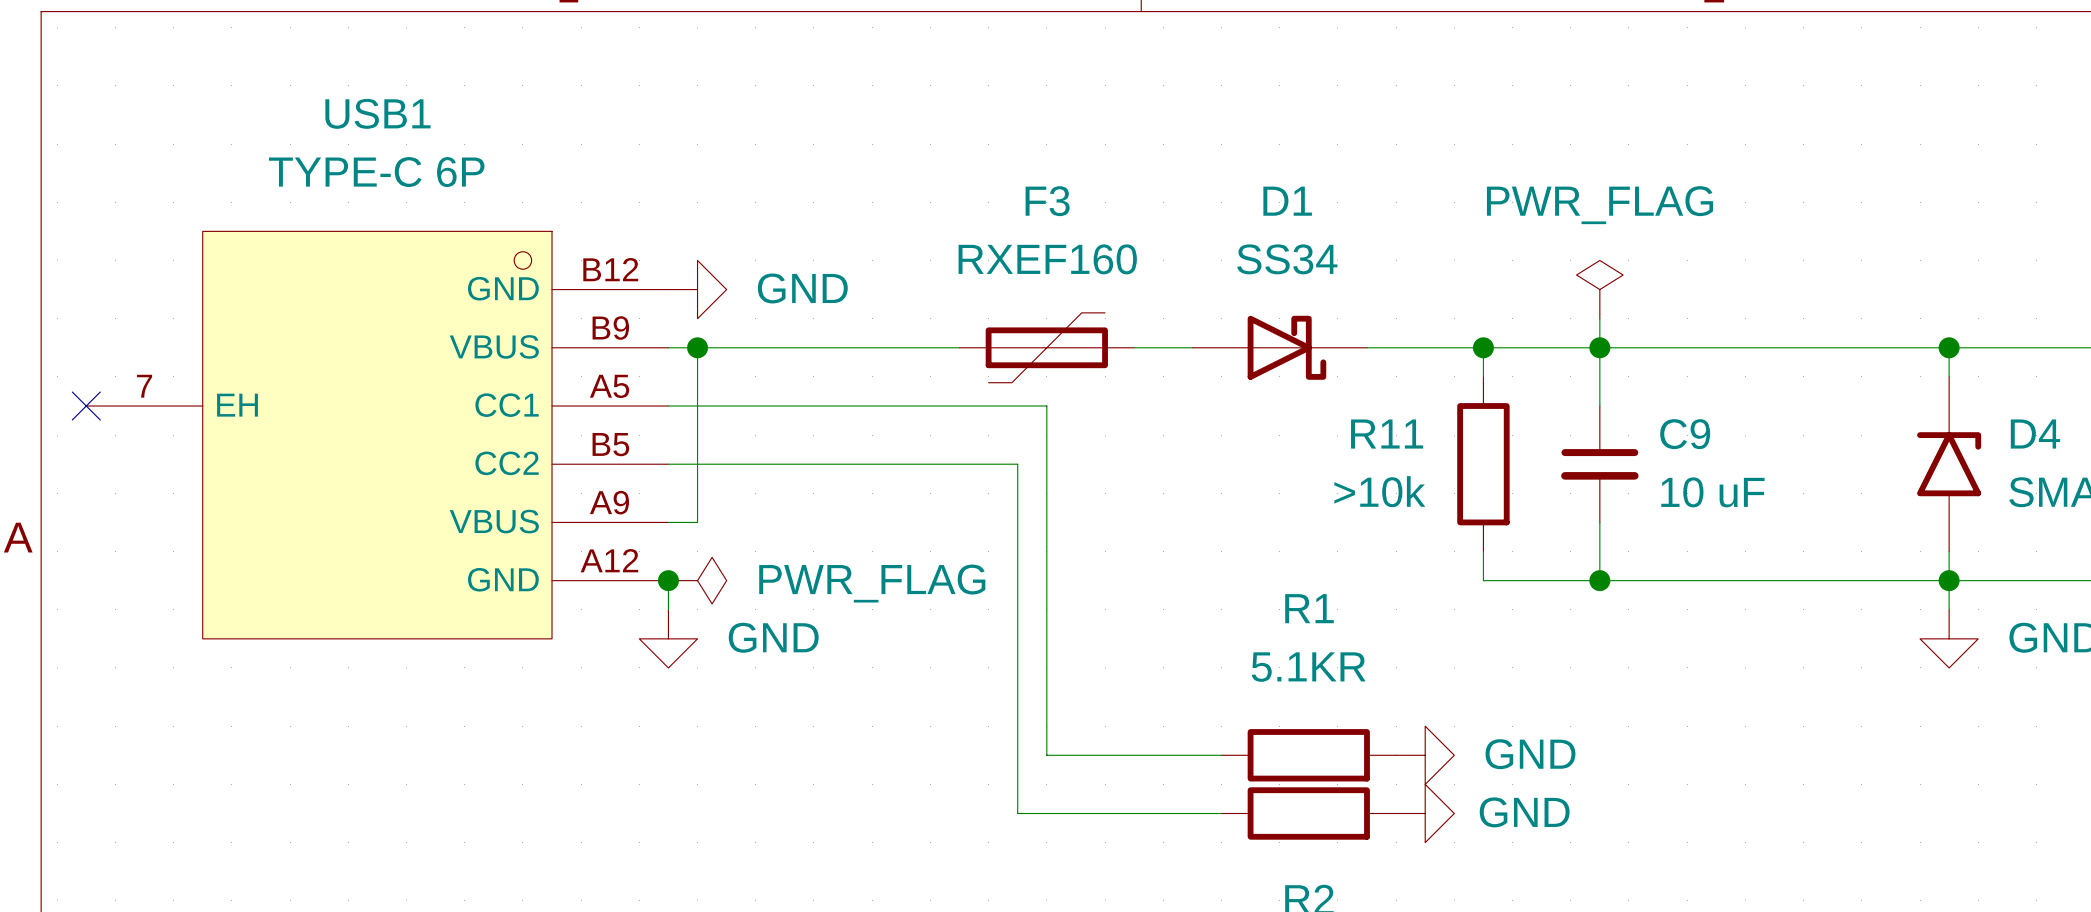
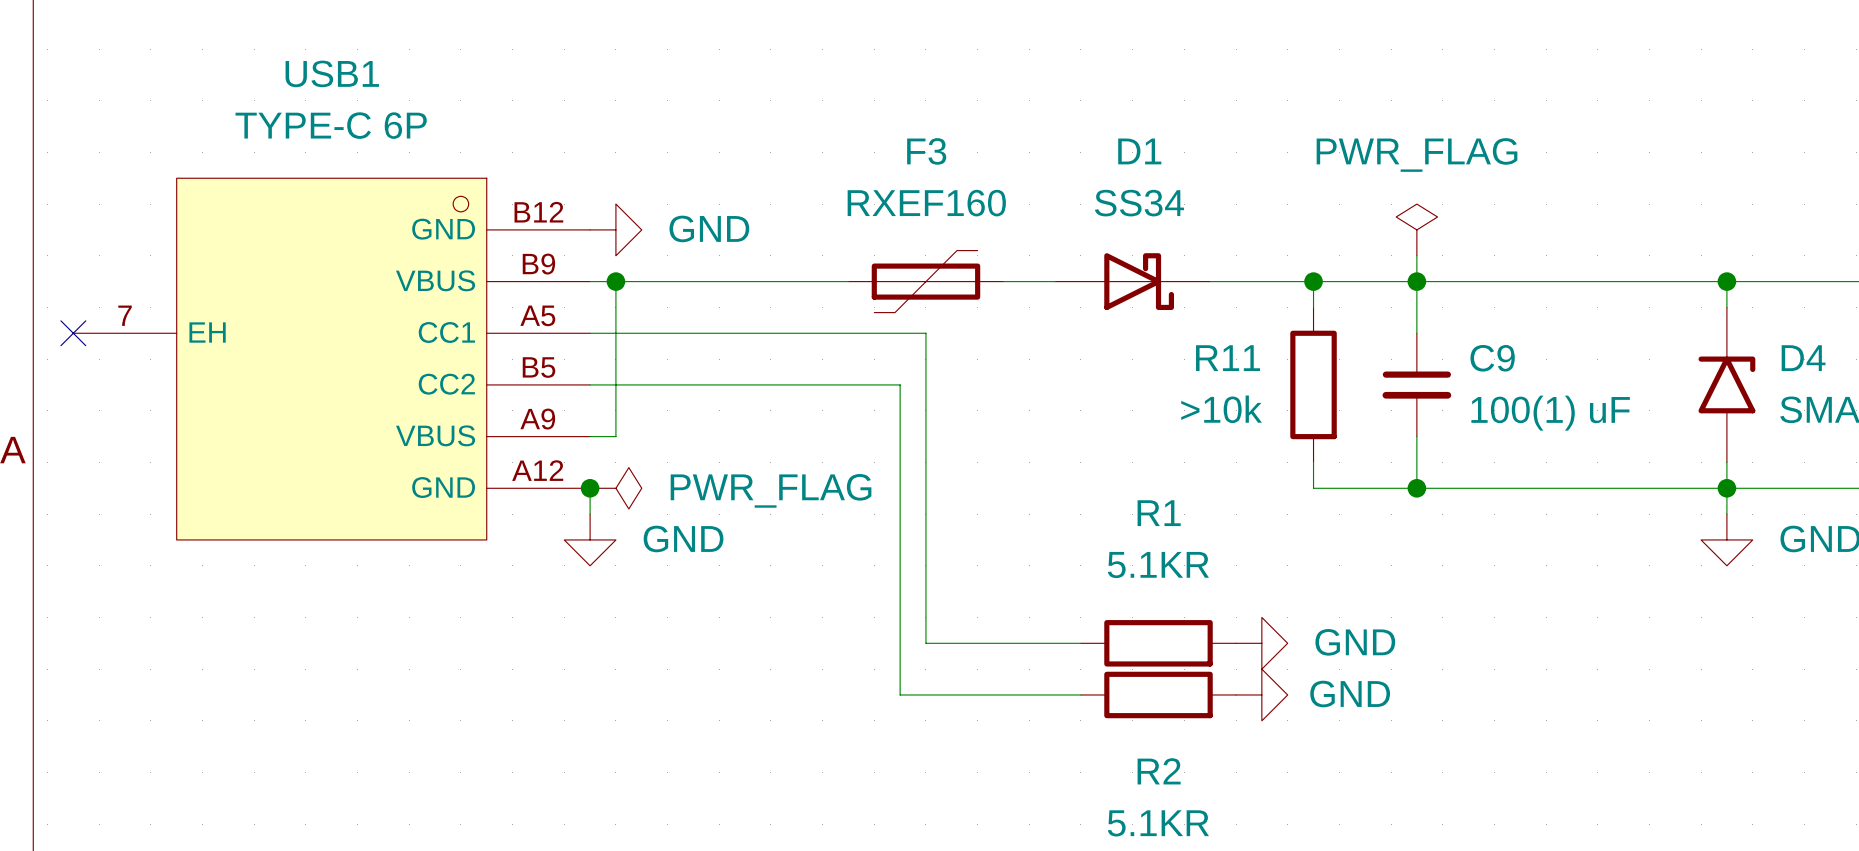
C9 value: 10 uF (1712, 492) -> 100(1) uF (1550, 413)

